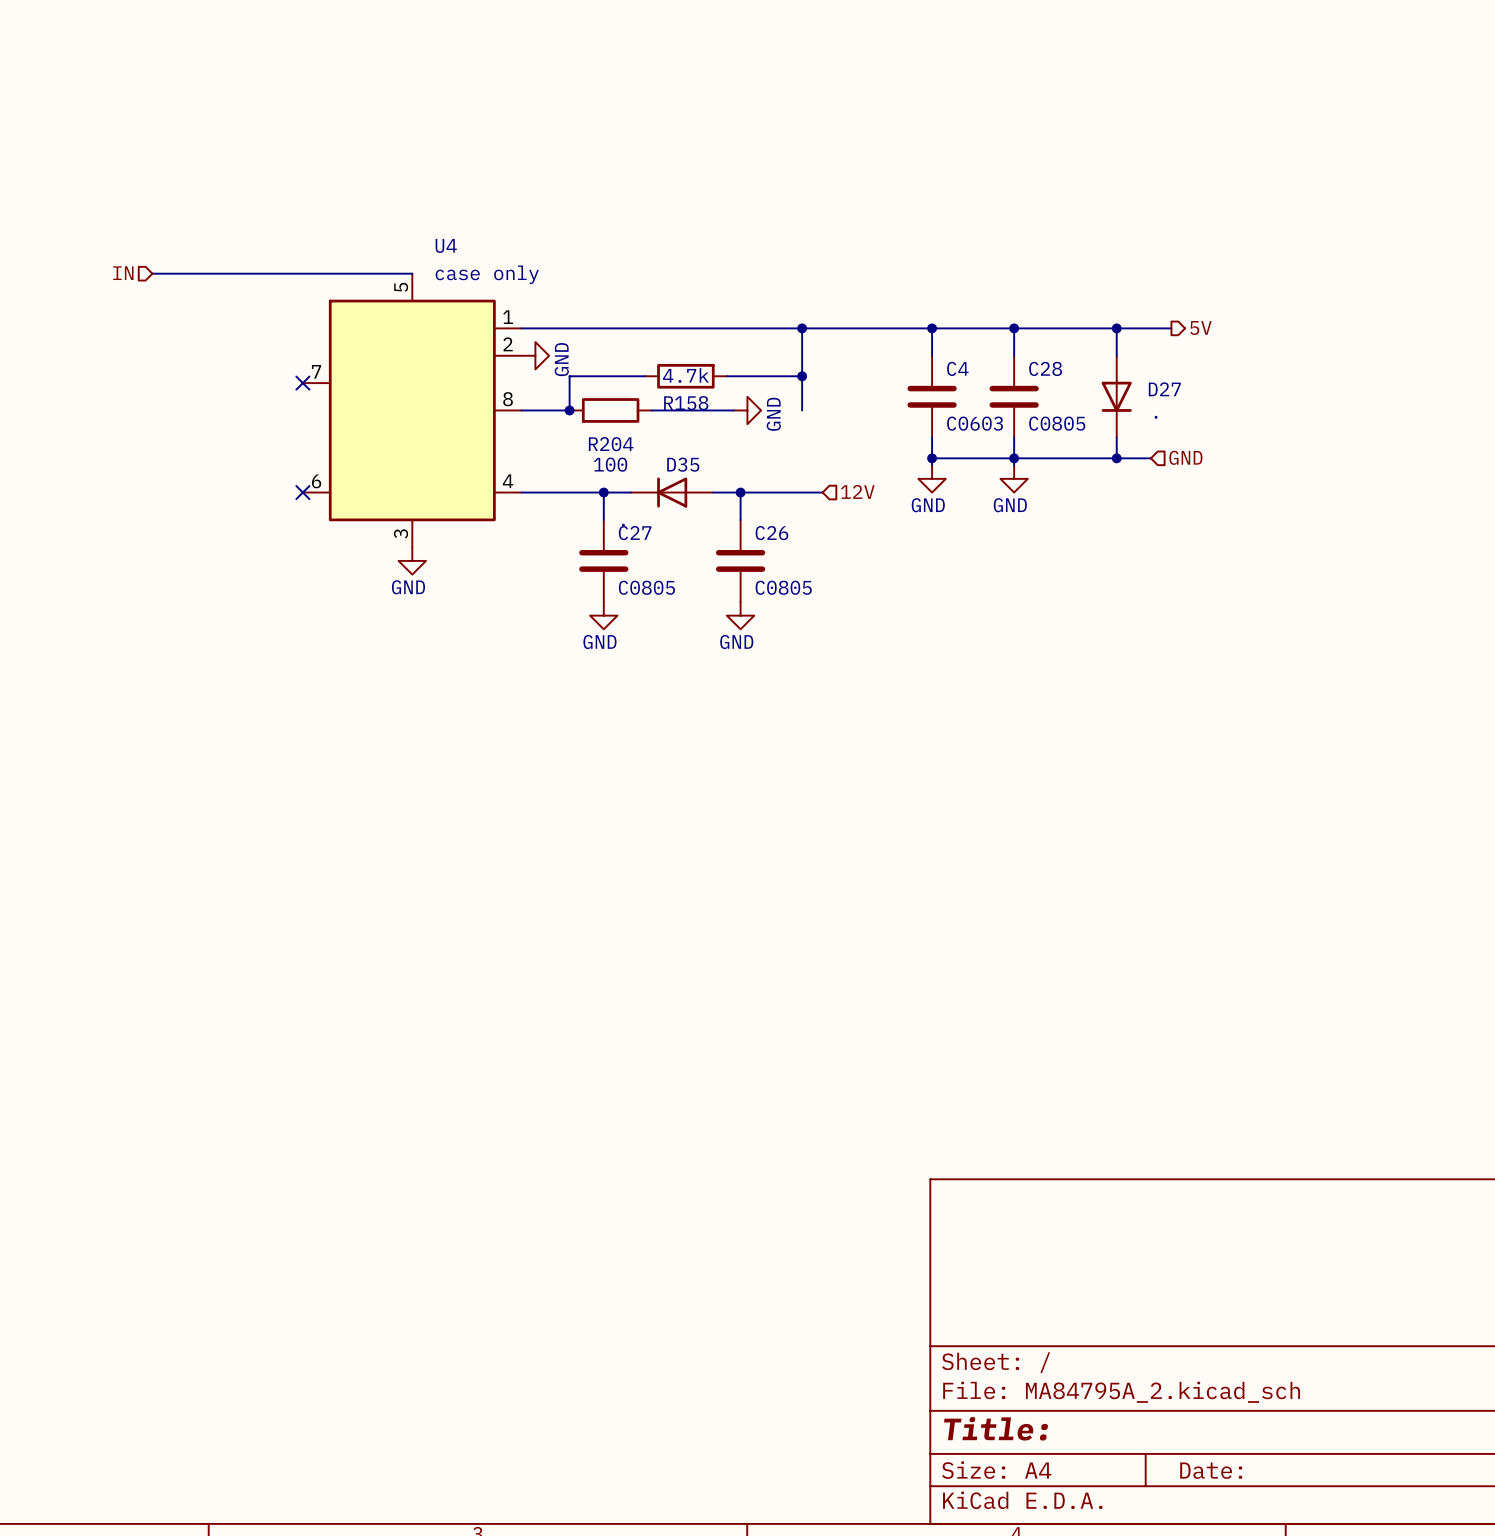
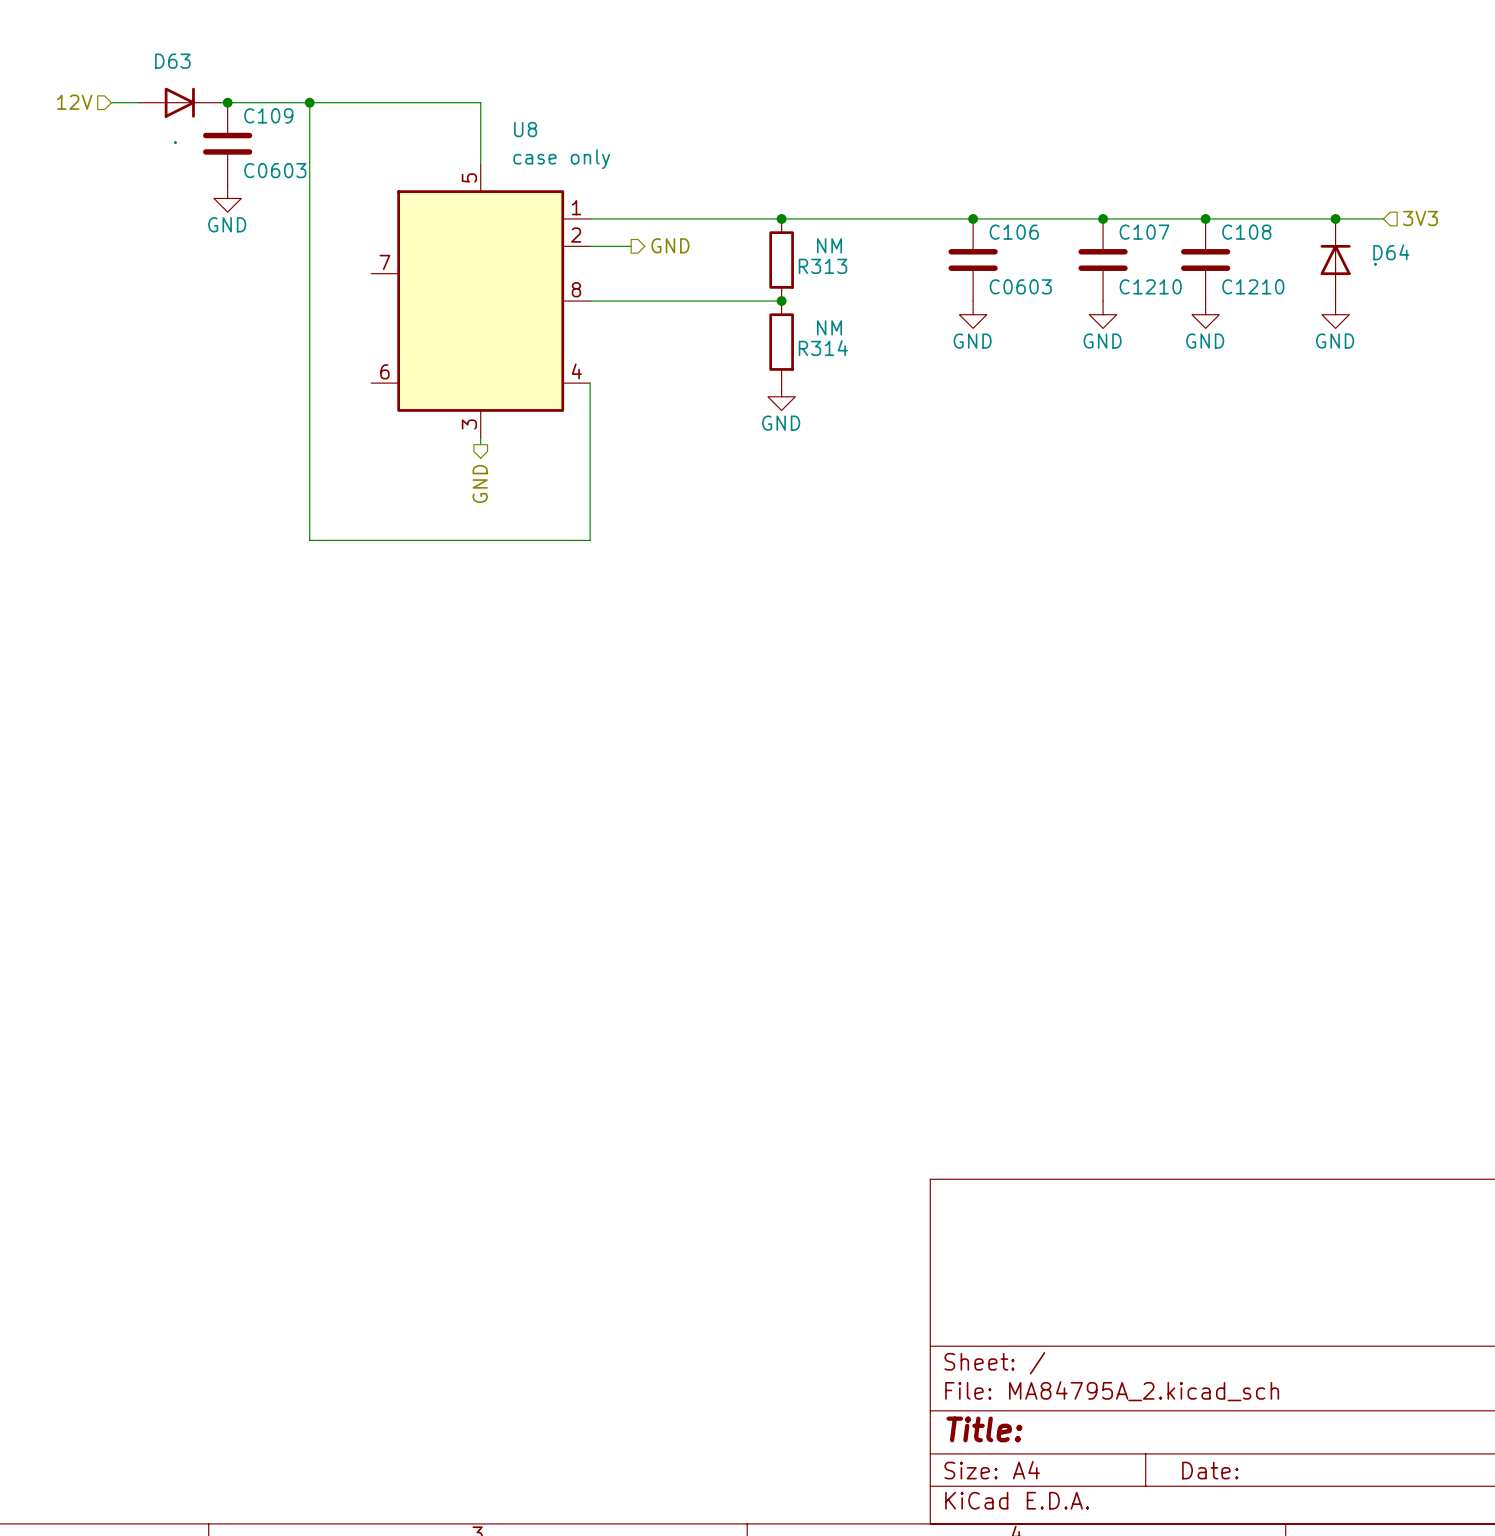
hierarchical label: none -> 12V (74, 102)
wire: none -> (111, 102) (138, 102)
D63: none -> . (179, 102)
wire: none -> (220, 102) (480, 102) (480, 164)
junction: none -> (227, 102)
wire: none -> (309, 102) (309, 540) (590, 540) (590, 383)
junction: none -> (309, 102)
C109: none -> C0603 (227, 143)
power symbol: none -> GND (227, 198)
wire: none -> (590, 218) (1383, 218)
junction: none -> (781, 218)
junction: none -> (973, 218)
junction: none -> (1103, 218)
junction: none -> (1205, 218)
junction: none -> (1335, 218)
hierarchical label: none -> 3V3 (1420, 218)
hierarchical label: none -> GND (670, 245)
wire: none -> (590, 246) (631, 246)
R313: none -> NM (781, 260)
C106: none -> C0603 (973, 260)
C107: none -> C1210 (1103, 260)
C108: none -> C1210 (1205, 260)
D64: none -> . (1335, 260)
hierarchical label: IN (123, 273) -> none
wire: (152, 273) (412, 273) -> none
U8: none -> case only (480, 301)
wire: none -> (590, 301) (781, 301)
power symbol: none -> GND (973, 314)
power symbol: none -> GND (1103, 314)
power symbol: none -> GND (1205, 314)
power symbol: none -> GND (1335, 314)
wire: (521, 328) (1171, 328) -> none
wire: (802, 328) (802, 410) -> none
junction position: (802, 328) -> (781, 301)
wire: (932, 328) (932, 355) -> none
junction: (932, 328) -> none
wire: (1014, 328) (1014, 355) -> none
junction: (1014, 328) -> none
wire: (1116, 328) (1116, 355) -> none
junction: (1116, 328) -> none
hierarchical label: 5V (1200, 328) -> none
R314: none -> NM (781, 342)
power symbol: GND (535, 355) -> none
wire: (644, 376) (569, 376) (569, 410) (521, 410) -> none
R158: 4.7k (685, 376) -> none
wire: (726, 376) (802, 376) -> none
junction: (802, 376) -> none
no-connect mark: (302, 383) -> none
C4: C0603 (932, 396) -> none
C28: C0805 (1014, 396) -> none
D27: . (1116, 396) -> none
U4: case only (412, 410) -> none
junction: (569, 410) -> none
R204: 100 (610, 410) -> none
wire: (651, 410) (733, 410) -> none
power symbol rotation: 0° (747, 410) -> 90° clockwise (781, 396)
power symbol position: GND (747, 410) -> GND (781, 396)
wire: (932, 437) (932, 465) -> none
wire: (1014, 437) (1014, 465) -> none
wire: (1116, 437) (1116, 458) -> none
hierarchical label: GND (1185, 457) -> none
wire: (932, 458) (1150, 458) -> none
junction: (932, 458) -> none
junction: (1014, 458) -> none
junction: (1116, 458) -> none
power symbol: GND (932, 478) -> none
power symbol: GND (1014, 478) -> none
hierarchical label: none -> GND (480, 483)
hierarchical label: 12V (857, 491) -> none
no-connect mark: (302, 492) -> none
wire: (521, 492) (631, 492) -> none
wire: (603, 492) (603, 519) -> none
junction: (603, 492) -> none
D35: . (672, 492) -> none
wire: (713, 492) (822, 492) -> none
wire: (740, 492) (740, 519) -> none
junction: (740, 492) -> none
power symbol: GND (412, 560) -> none
C27: C0805 (603, 560) -> none
C26: C0805 (740, 560) -> none
power symbol: GND (603, 615) -> none
power symbol: GND (740, 615) -> none

